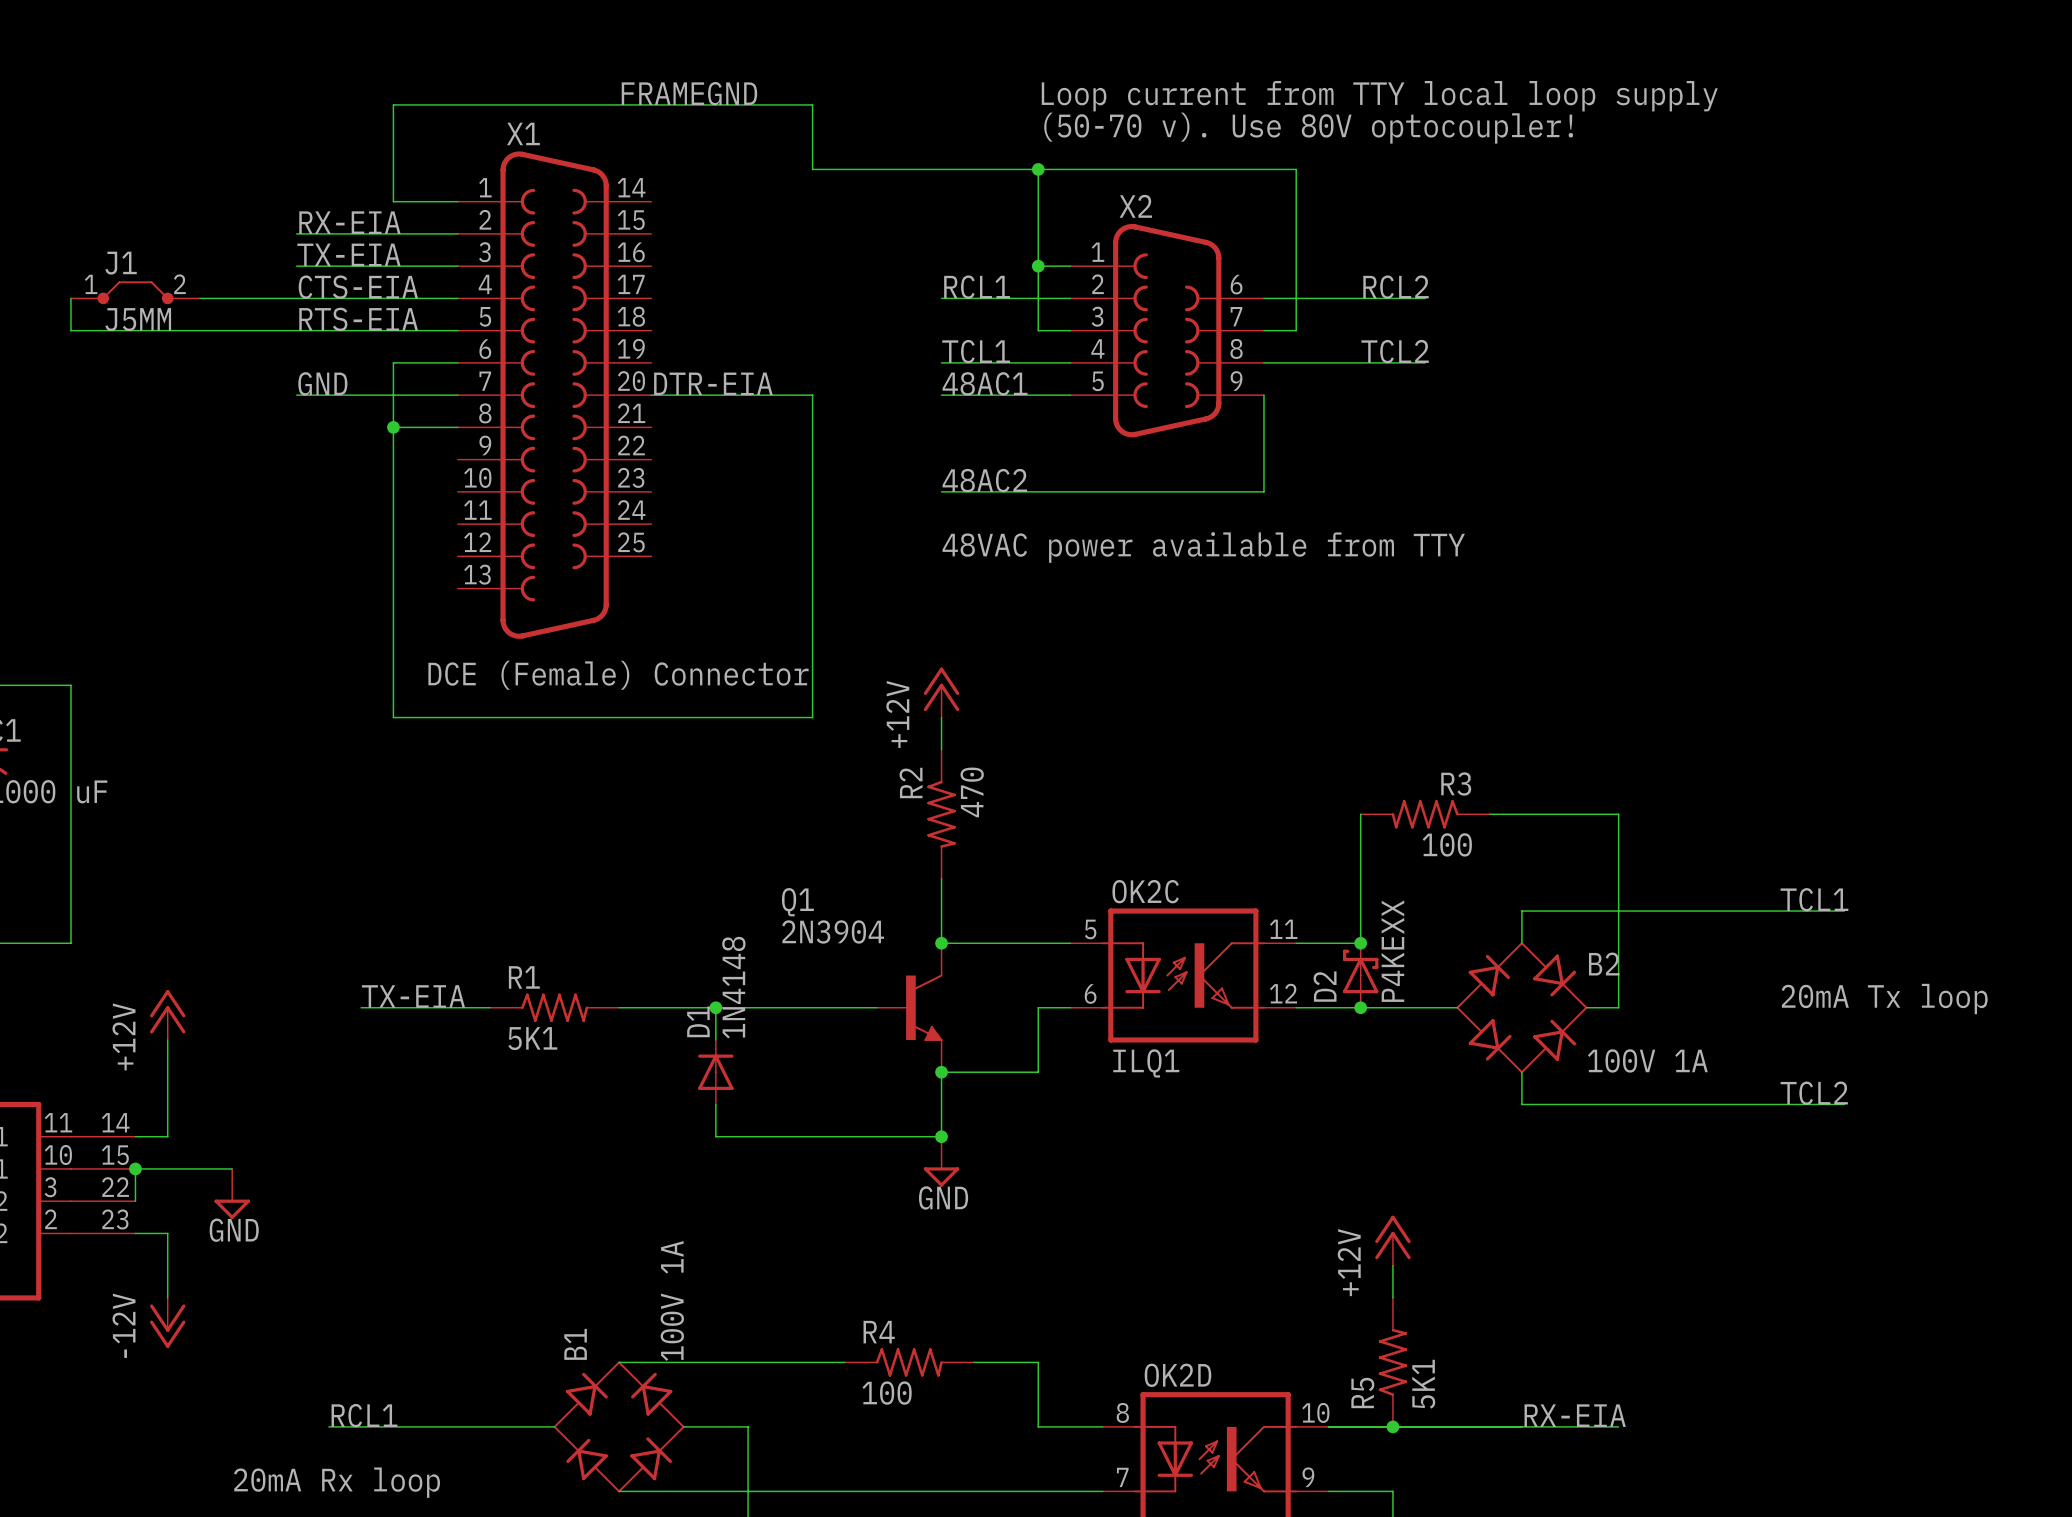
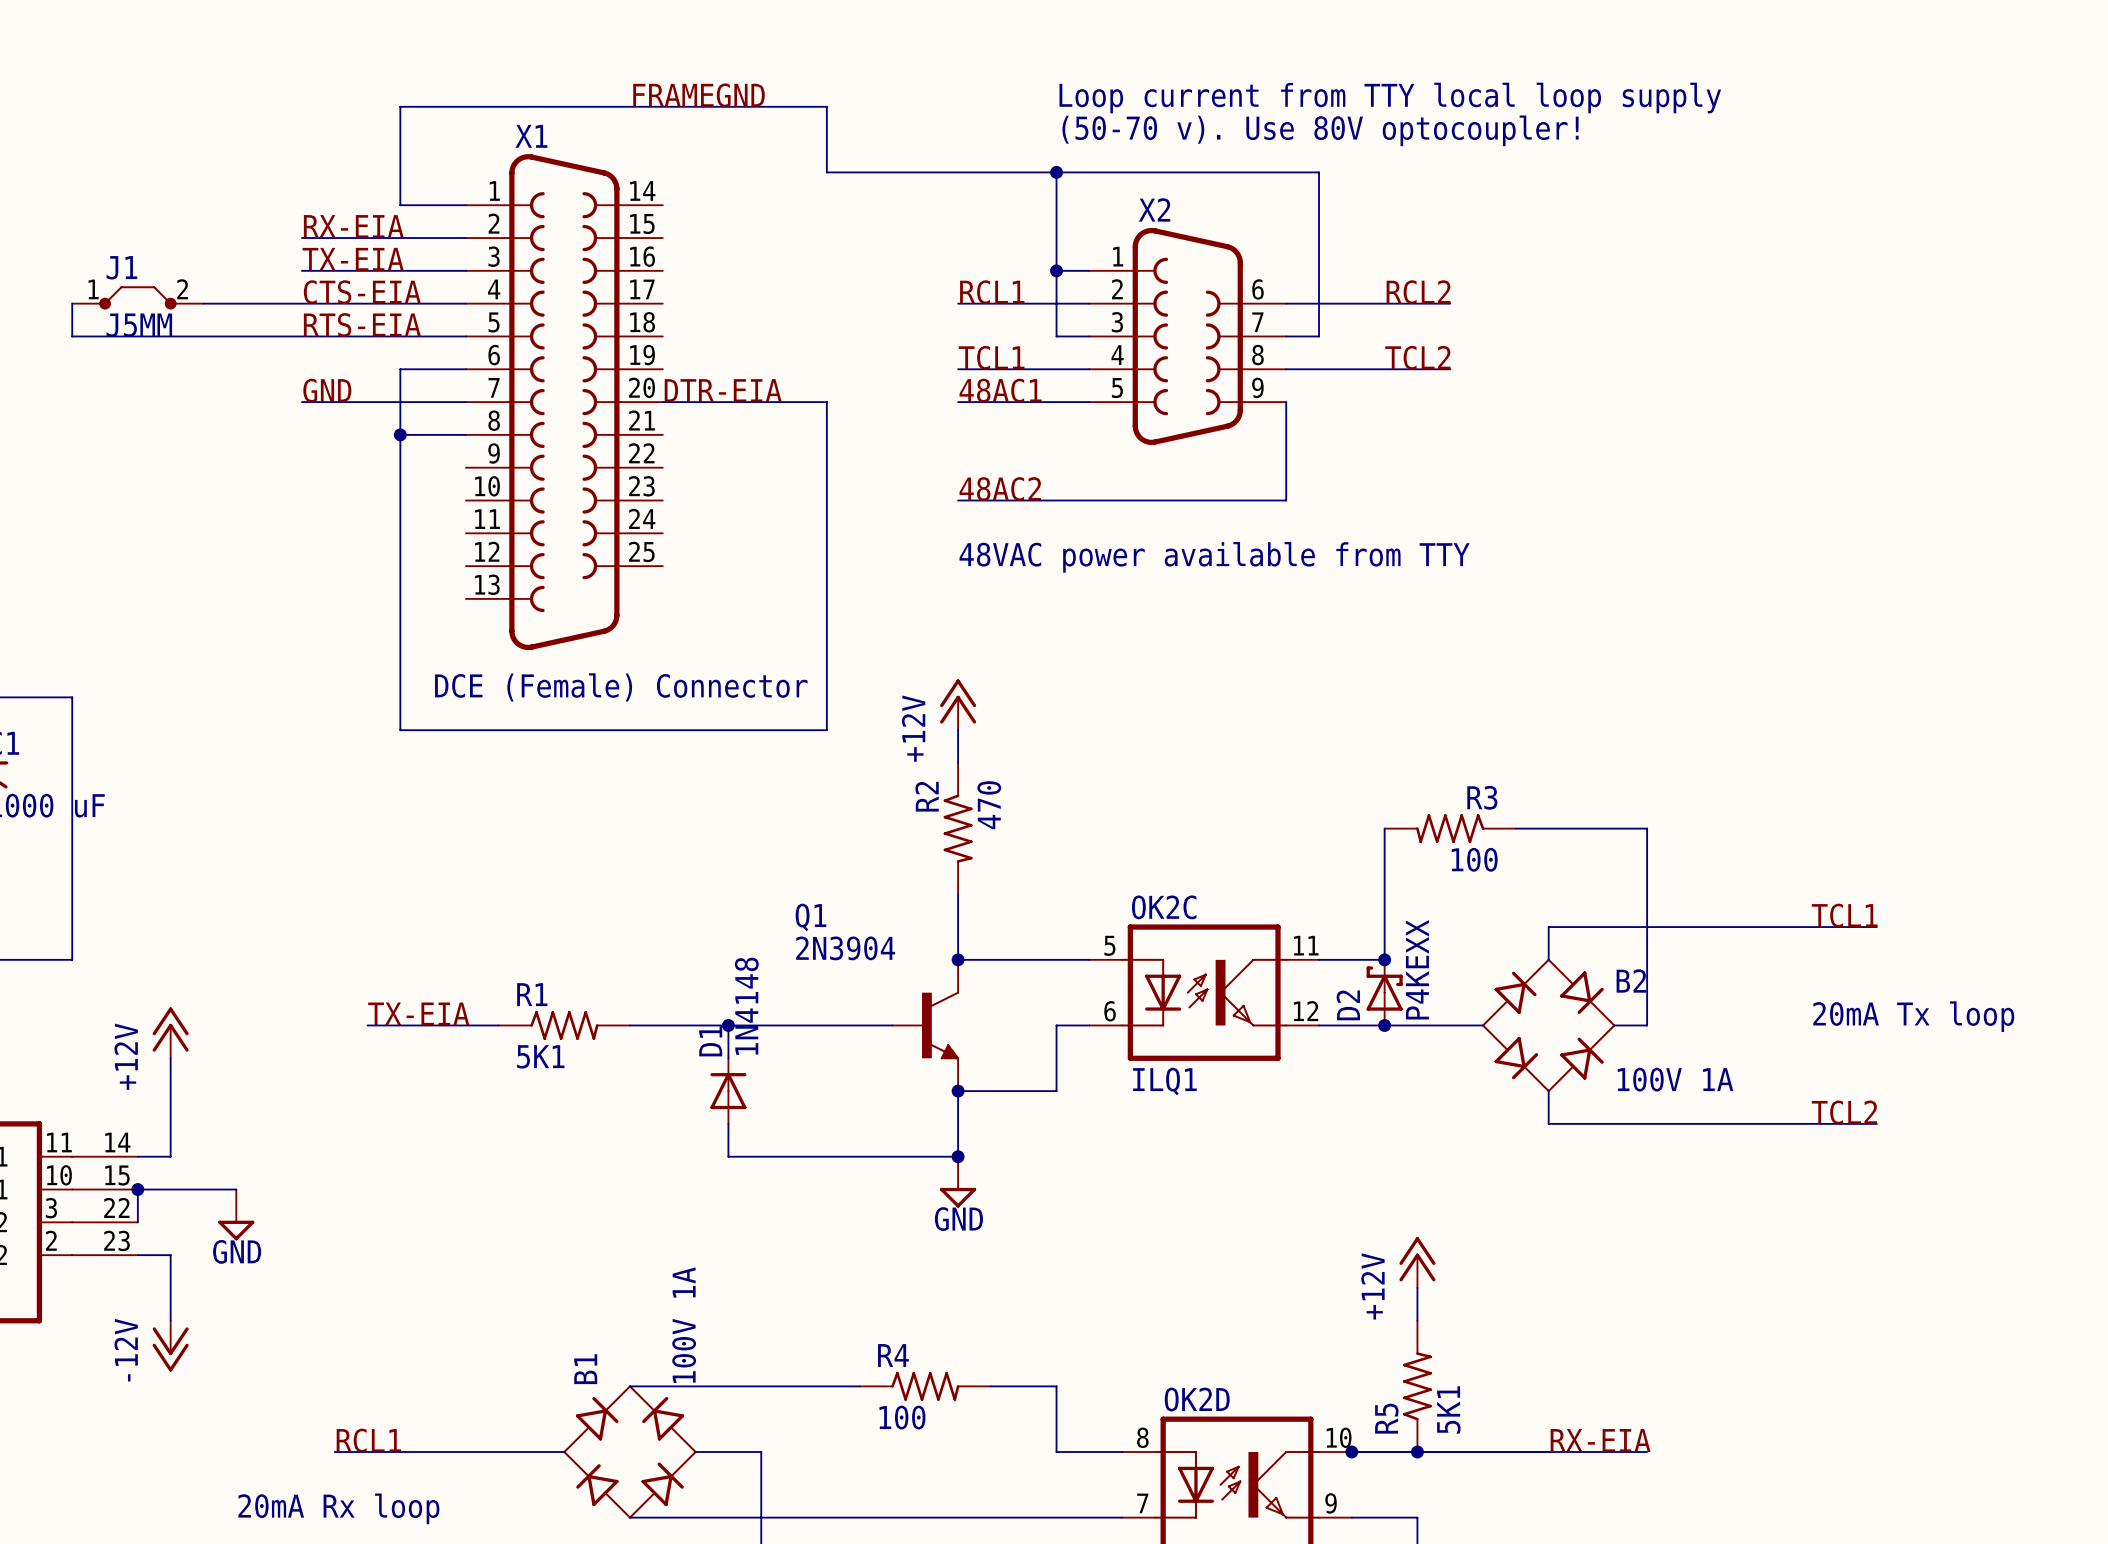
junction: none -> (1351, 1452)

